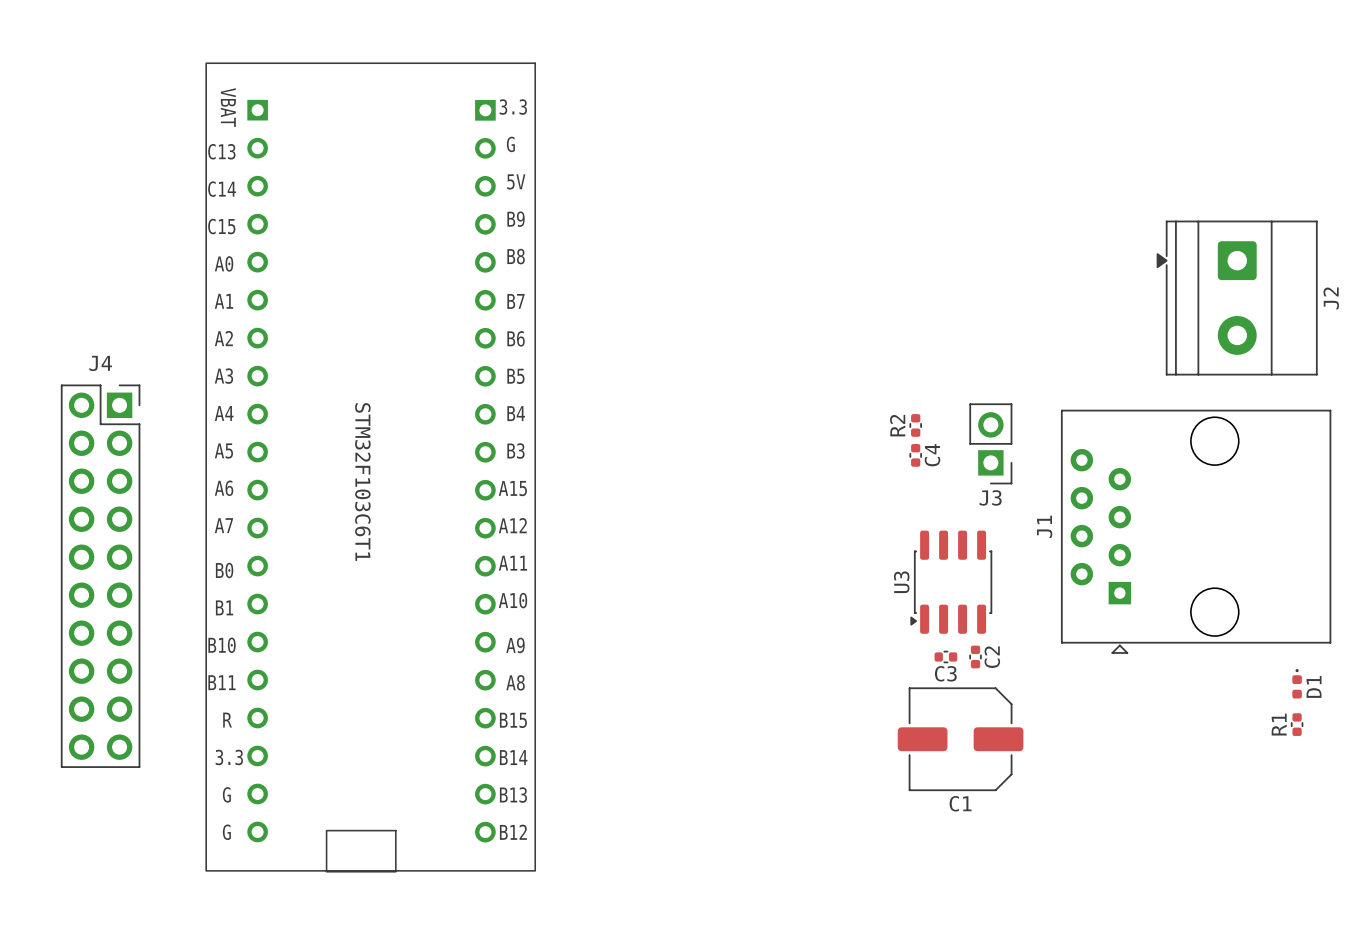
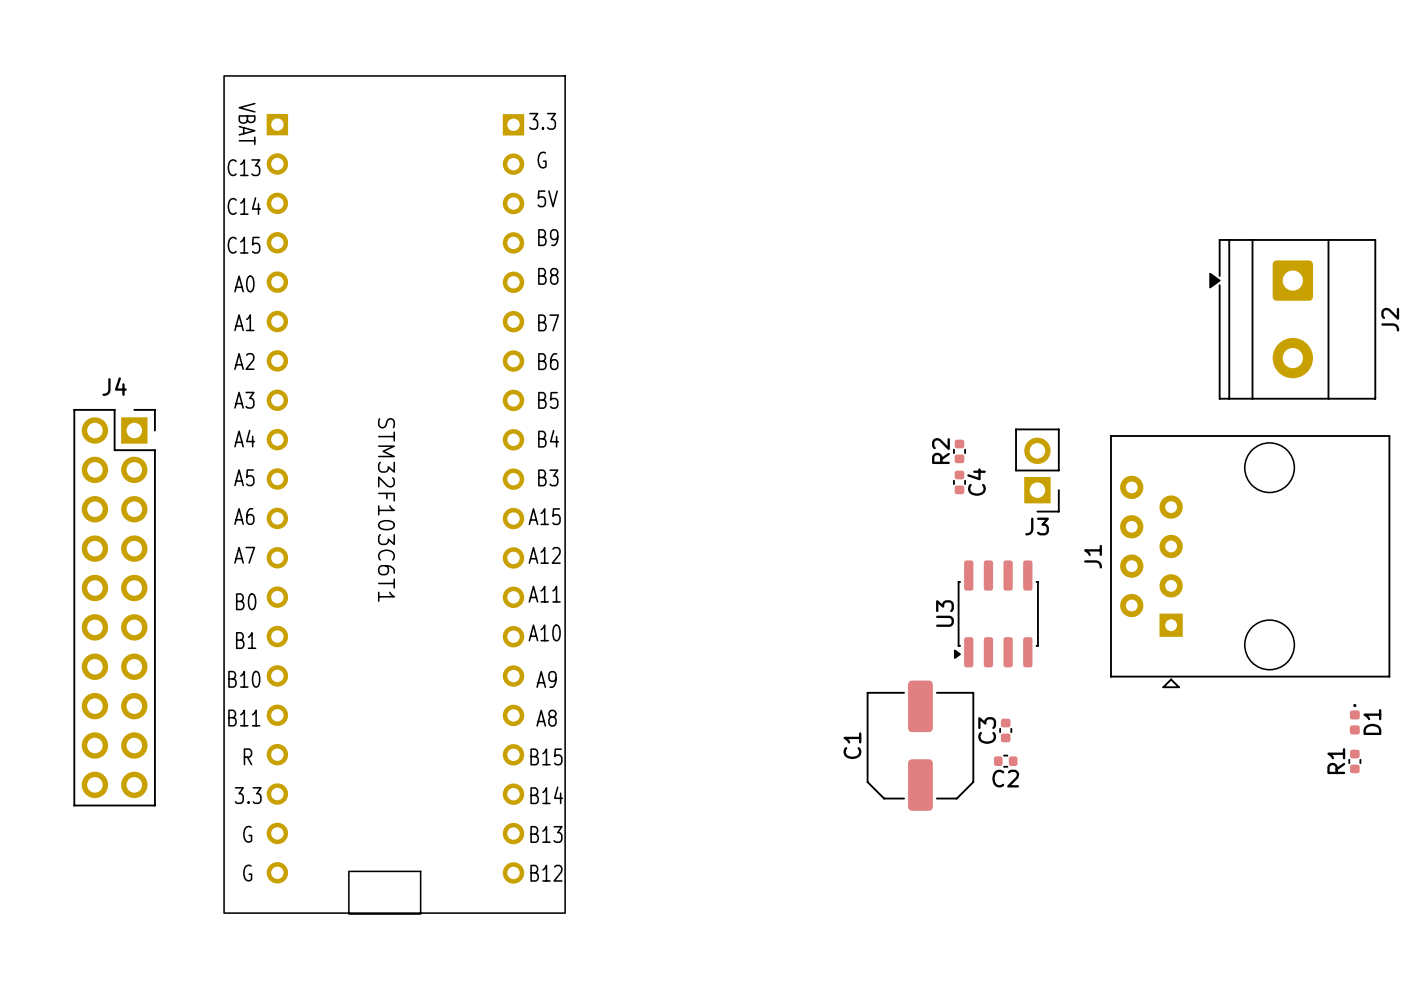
C3 rotation: 0° (945, 656) -> 90° clockwise (1005, 730)
C3 position: (945, 656) -> (1005, 730)
C2 rotation: 0° (975, 656) -> 90° clockwise (1005, 761)
C2 position: (975, 656) -> (1005, 761)
C1 rotation: 0° (960, 739) -> 90° clockwise (920, 745)
C1 position: (960, 739) -> (920, 745)

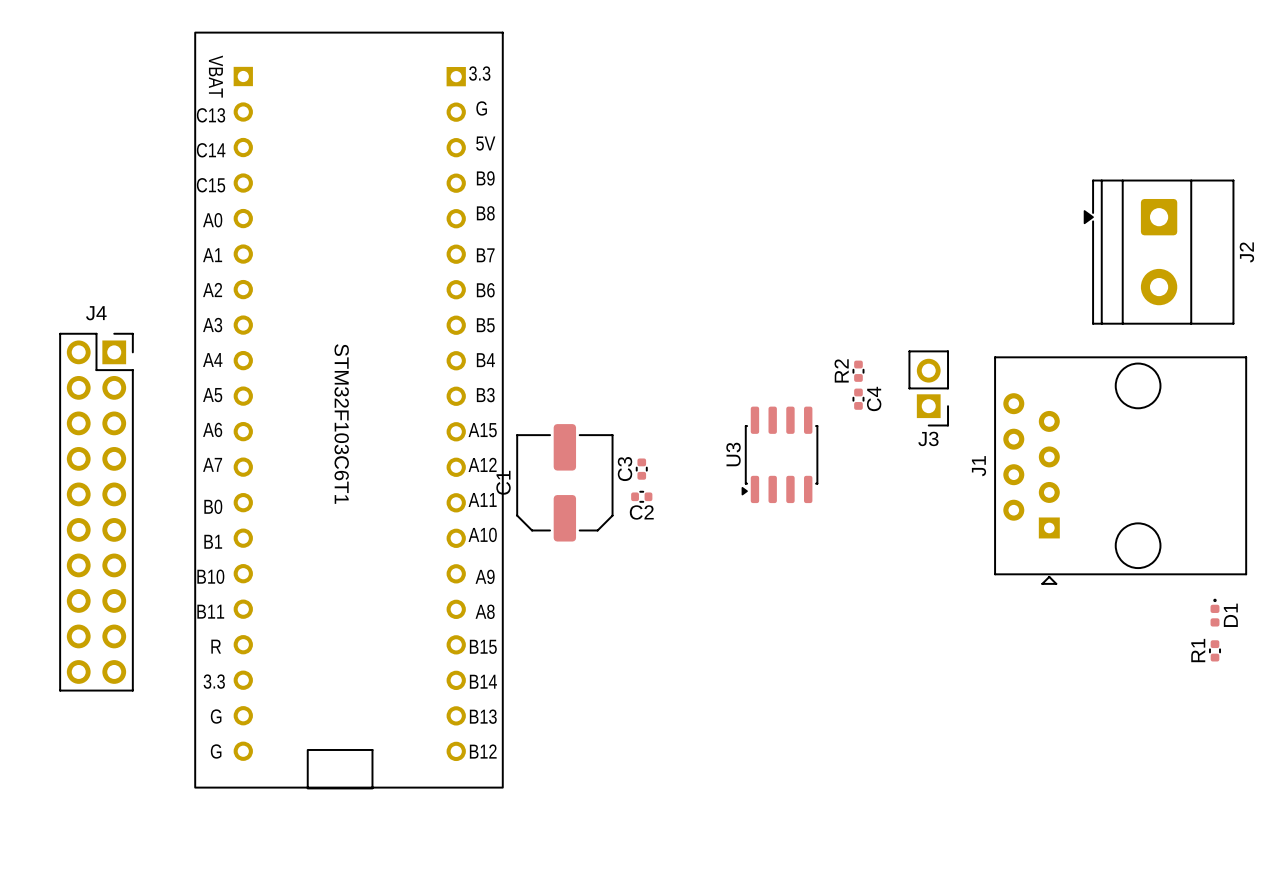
U3 position: (996, 613) -> (779, 454)
C3 position: (1005, 730) -> (641, 469)
C1 position: (920, 745) -> (564, 482)
C2 position: (1005, 761) -> (641, 496)

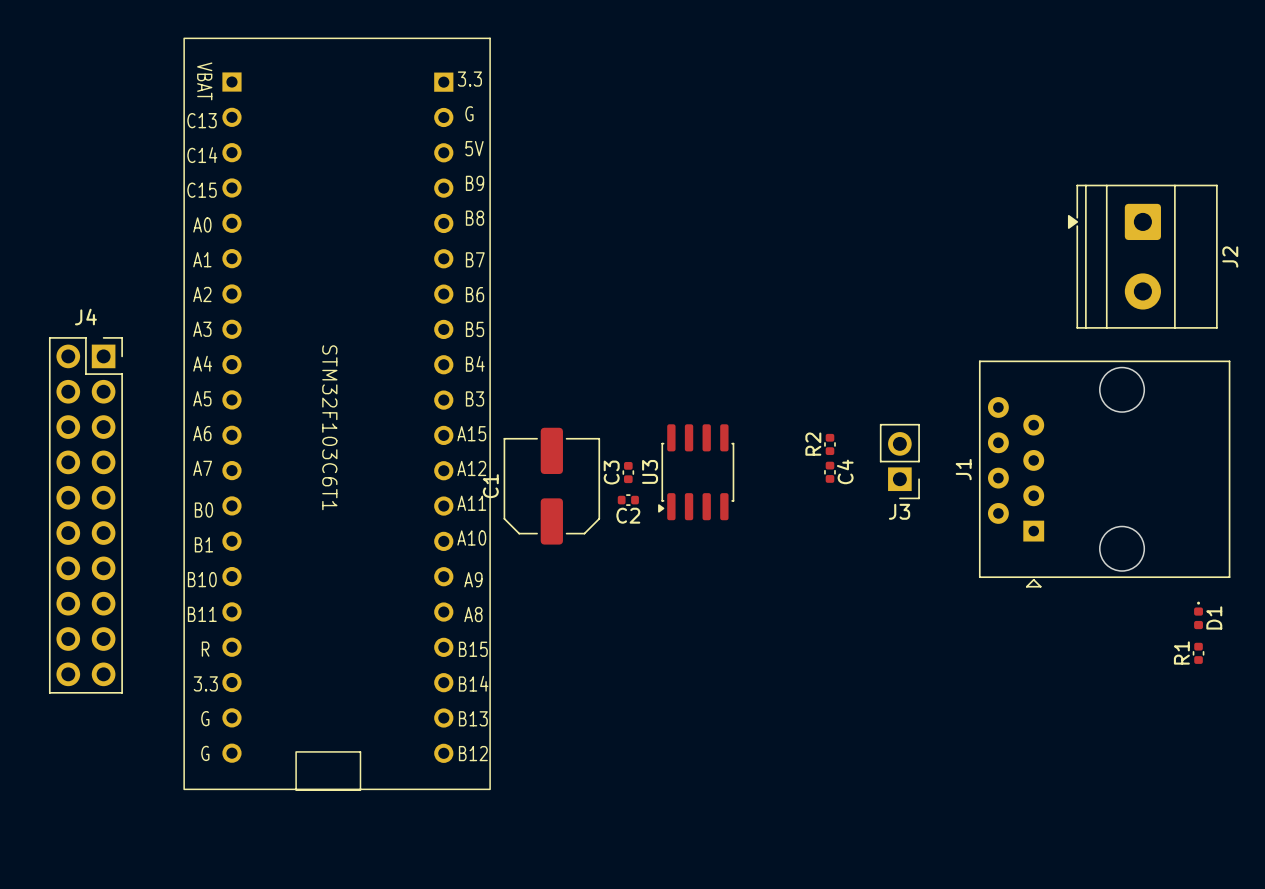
R2 position: (858, 371) -> (829, 444)
J3 position: (928, 388) -> (899, 461)
C4 position: (858, 399) -> (829, 472)
U3 position: (779, 454) -> (696, 472)

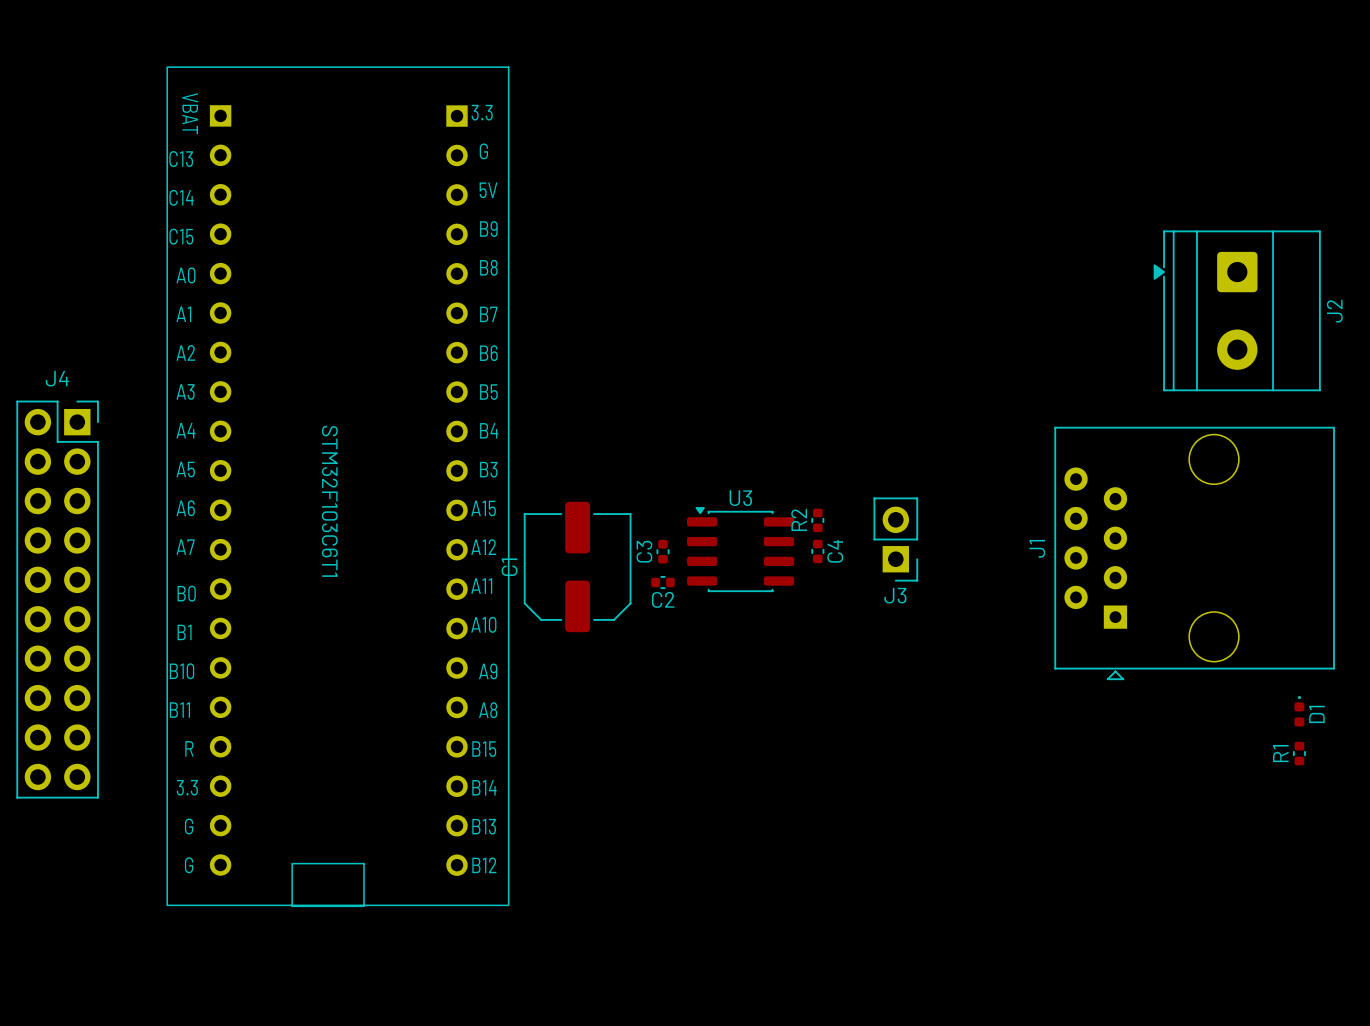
R2 position: (829, 444) -> (817, 520)
J3 position: (899, 461) -> (895, 539)
U3 rotation: 0° (696, 472) -> 90° clockwise (740, 549)
C4 position: (829, 472) -> (817, 551)

